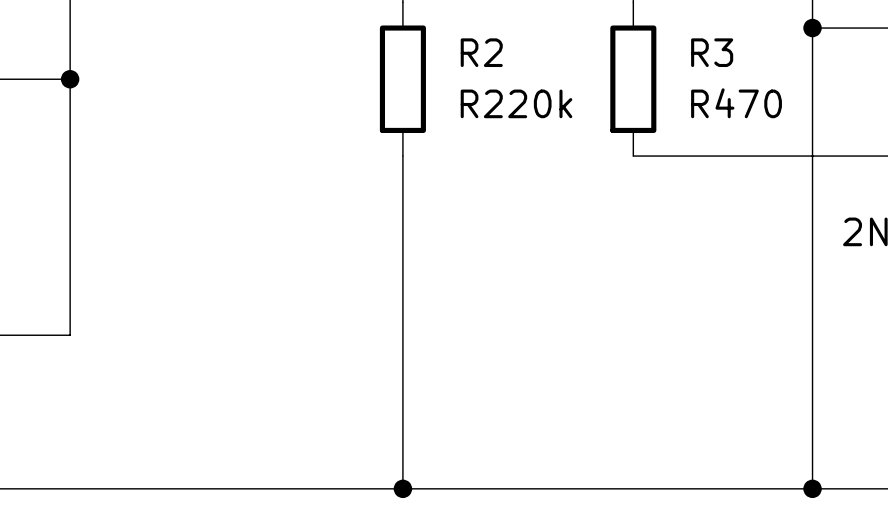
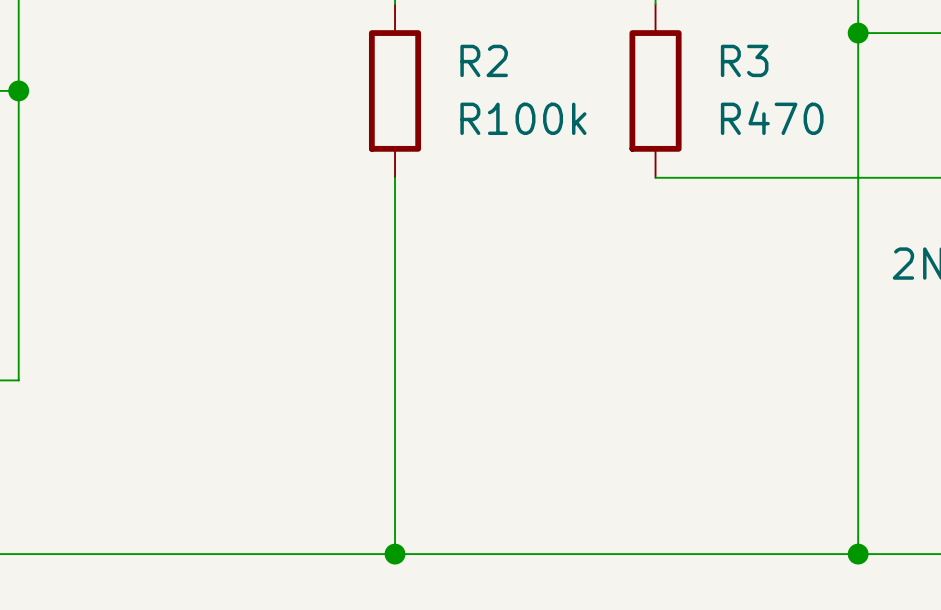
R2 value: R220k (516, 103) -> R100k (523, 118)

